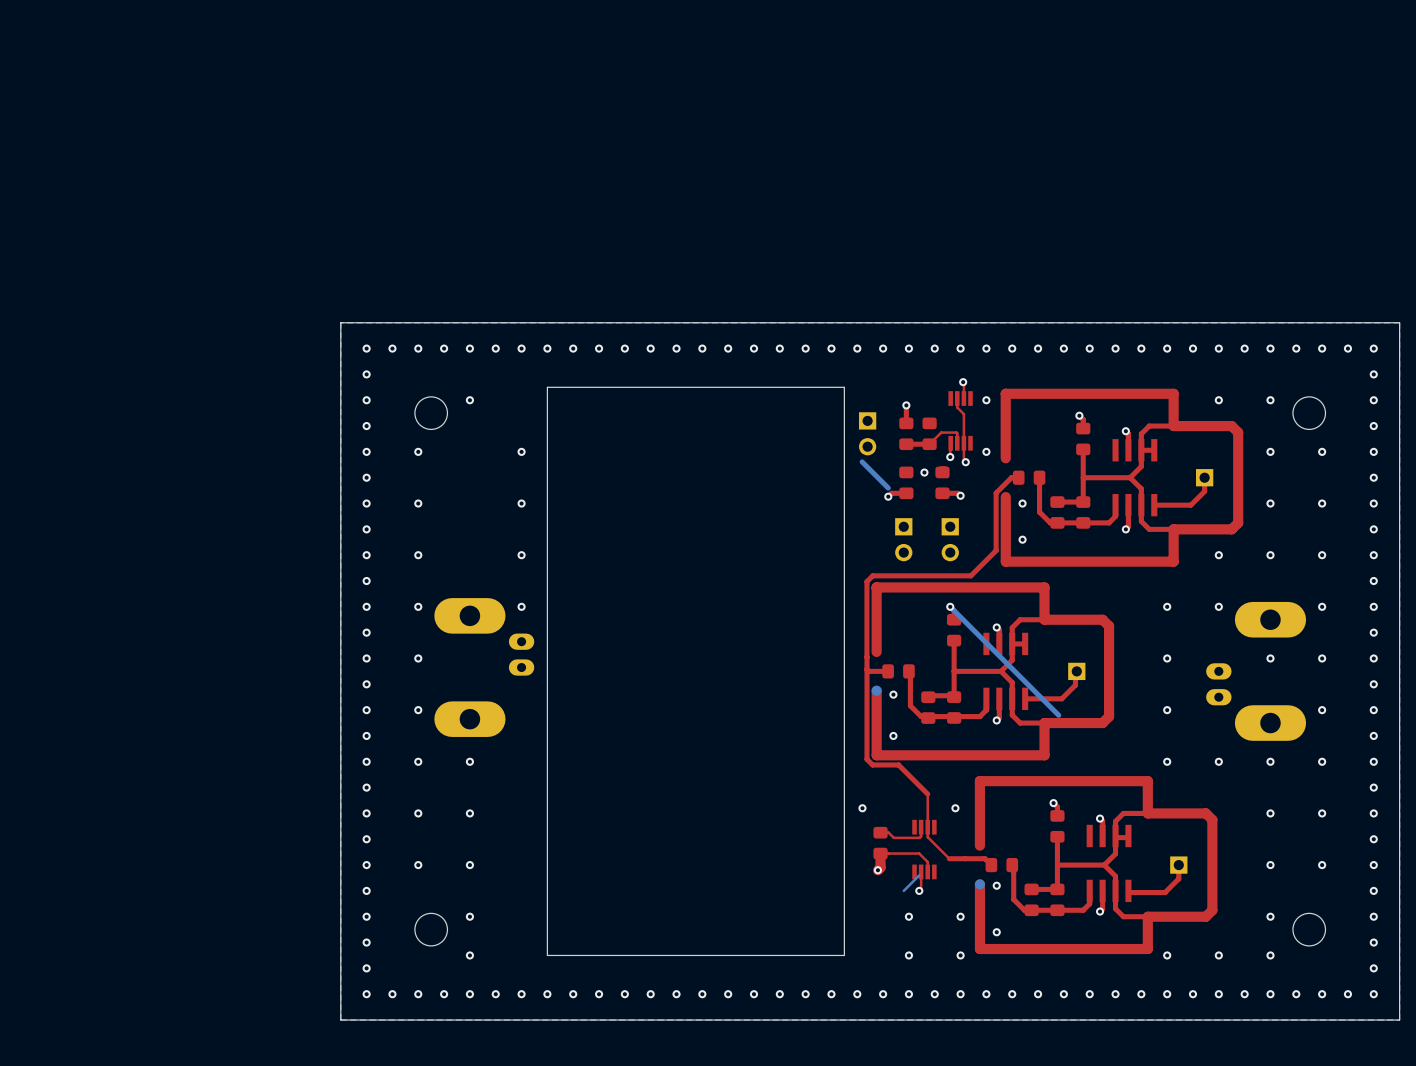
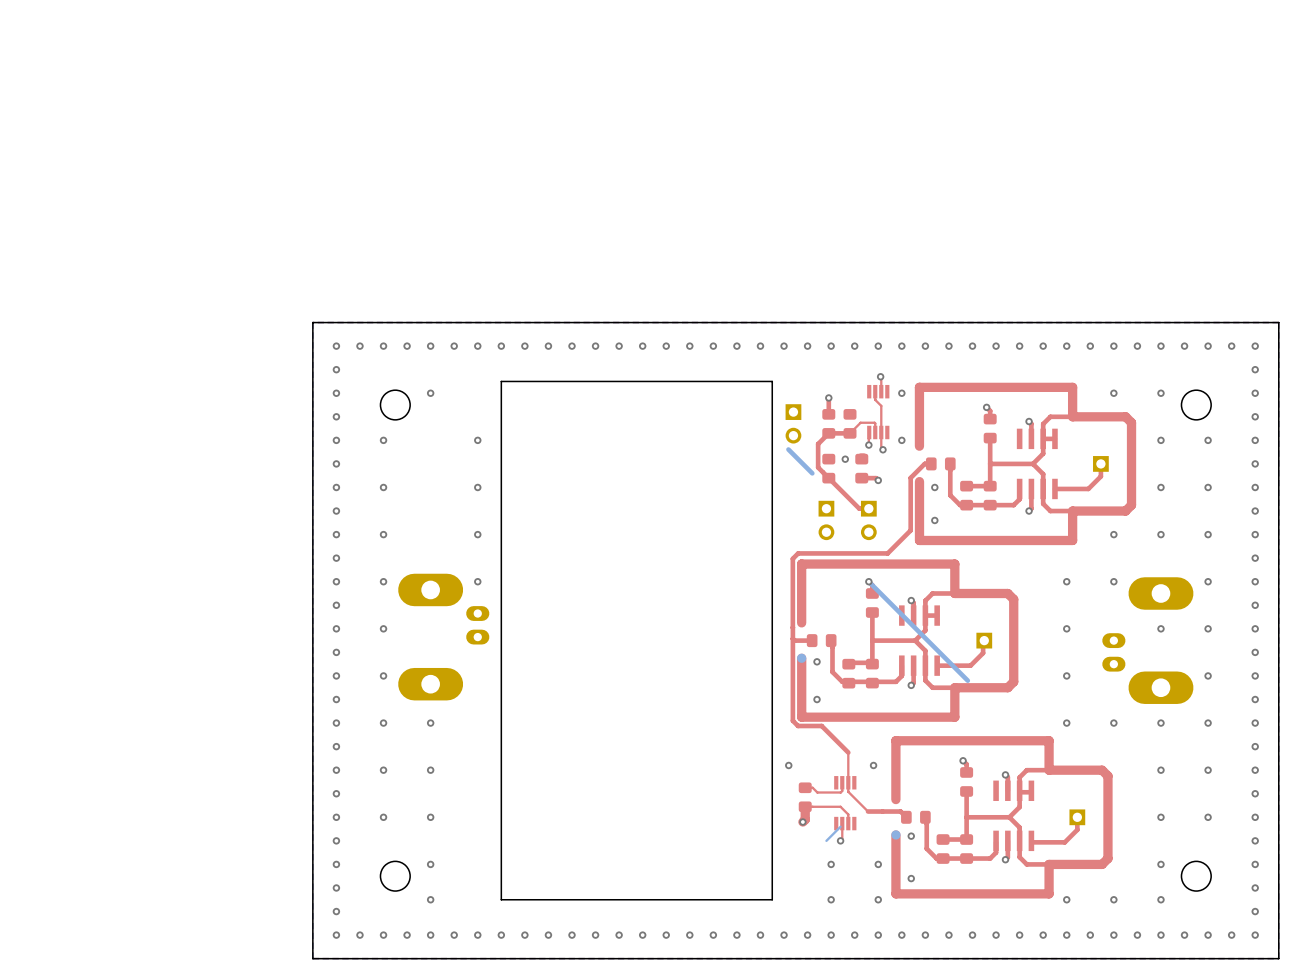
top track: none -> (828, 433) (818, 444) (818, 467) (859, 508) (868, 508)
top track: (906, 493) (891, 493) (888, 496) -> none
via: (888, 496) -> none

